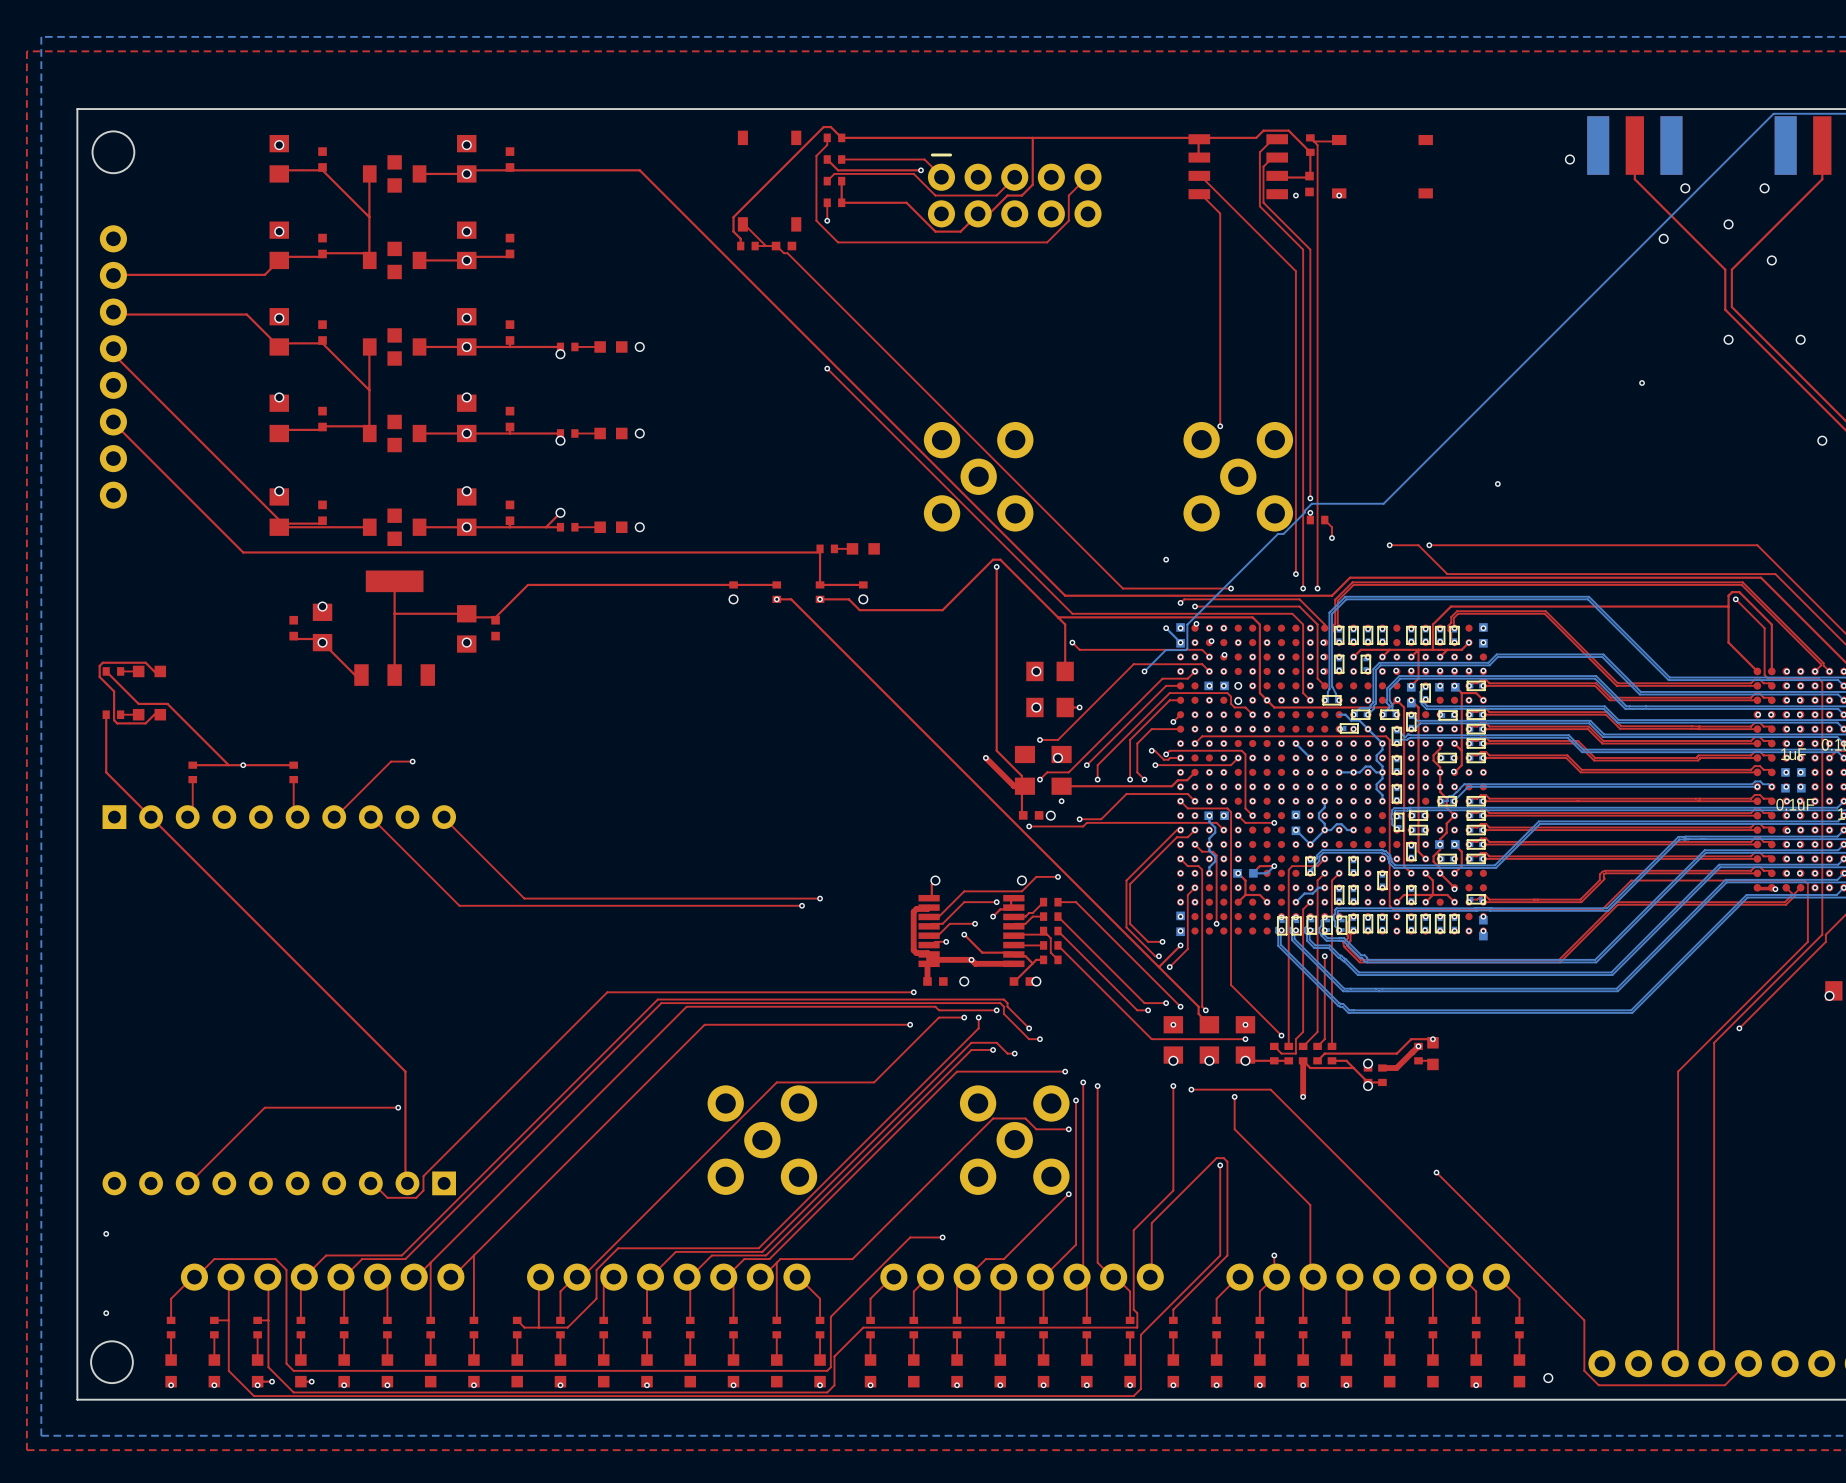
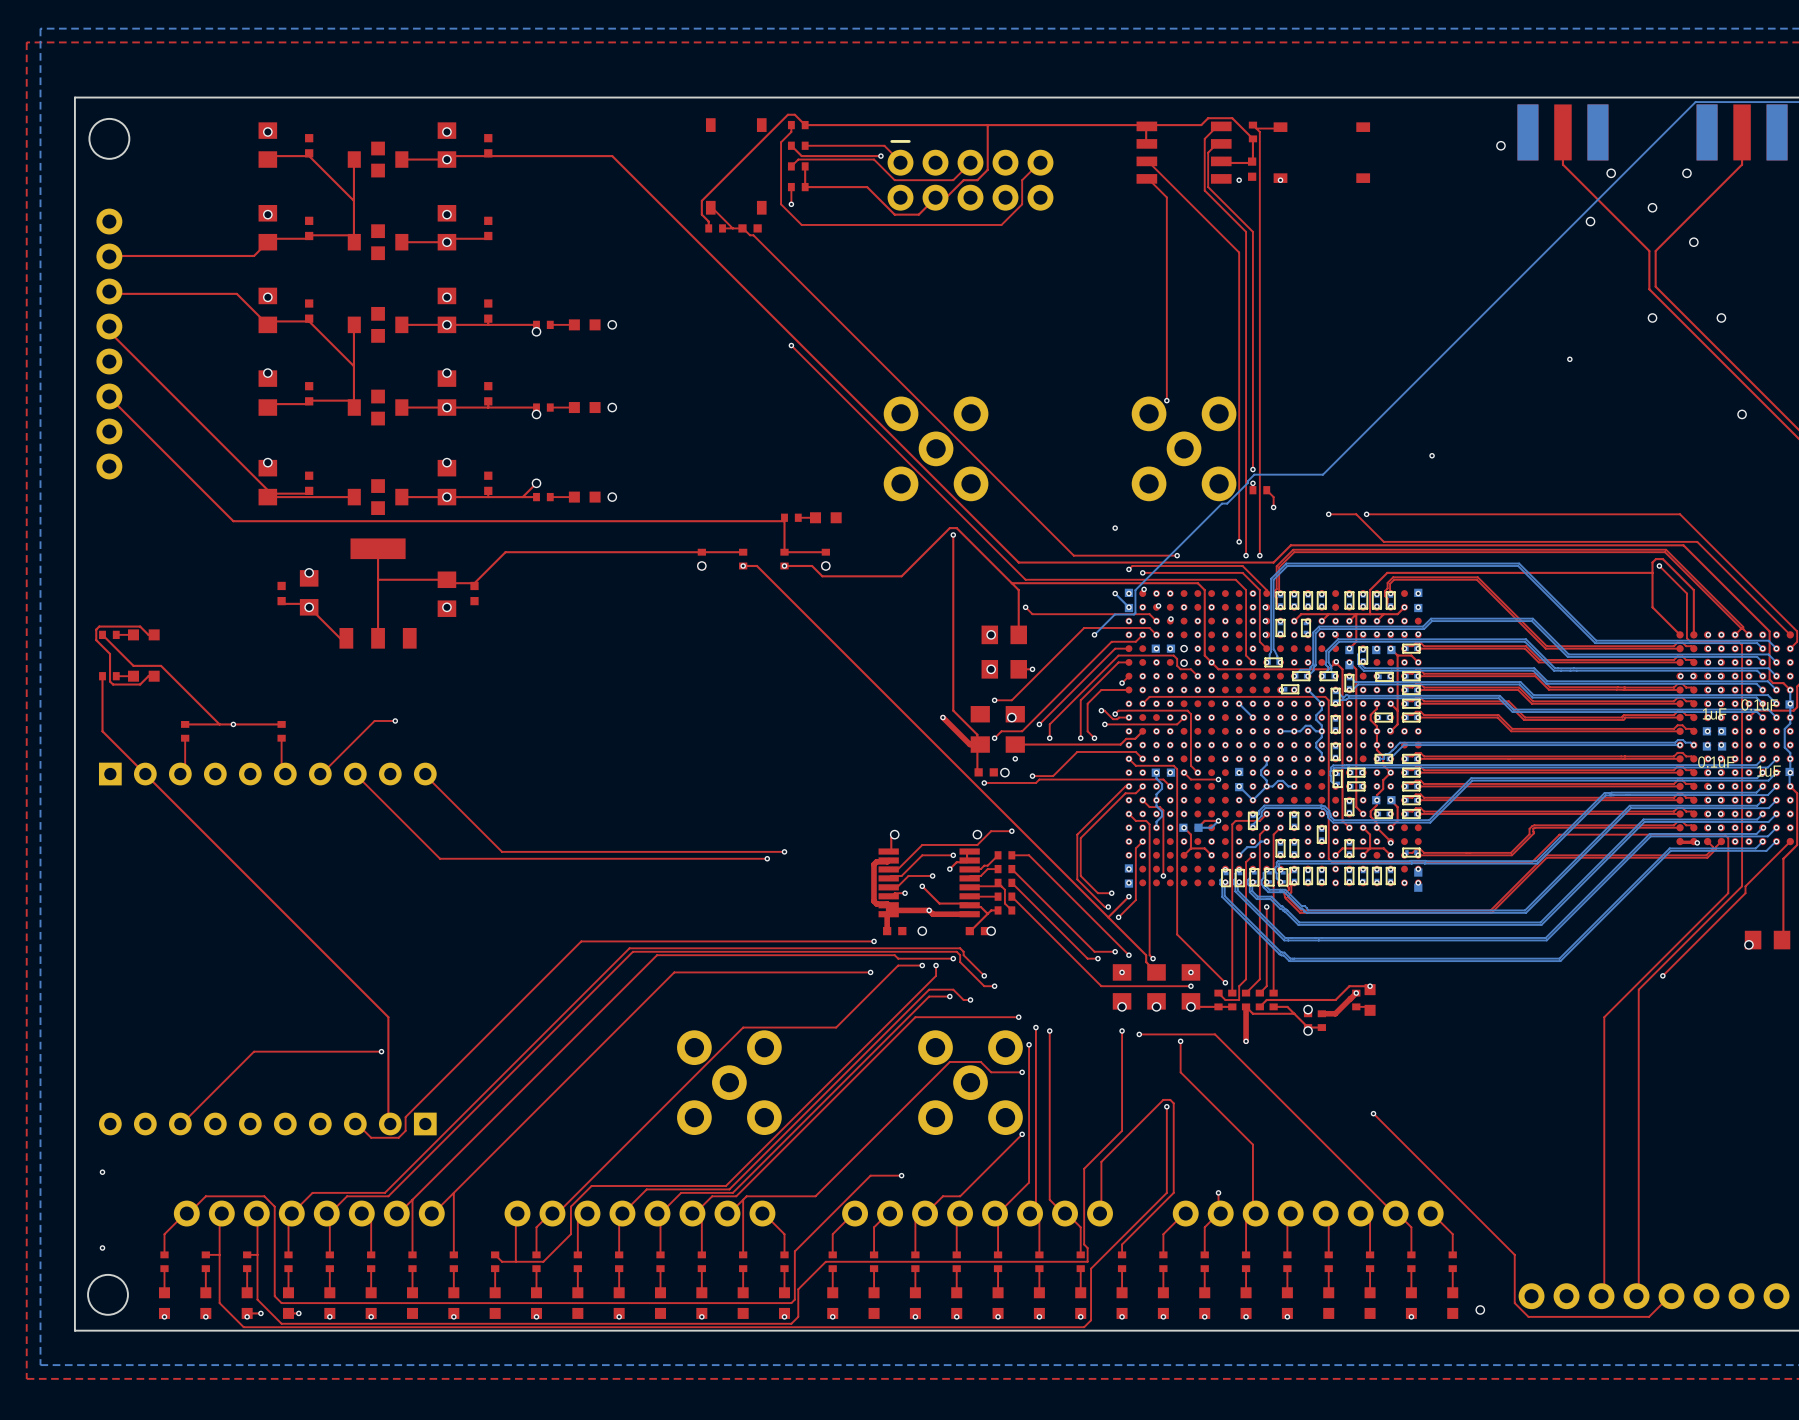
bottom track: (1339, 714) (1345, 714) (1351, 720) (1359, 720) (1368, 729) -> none

